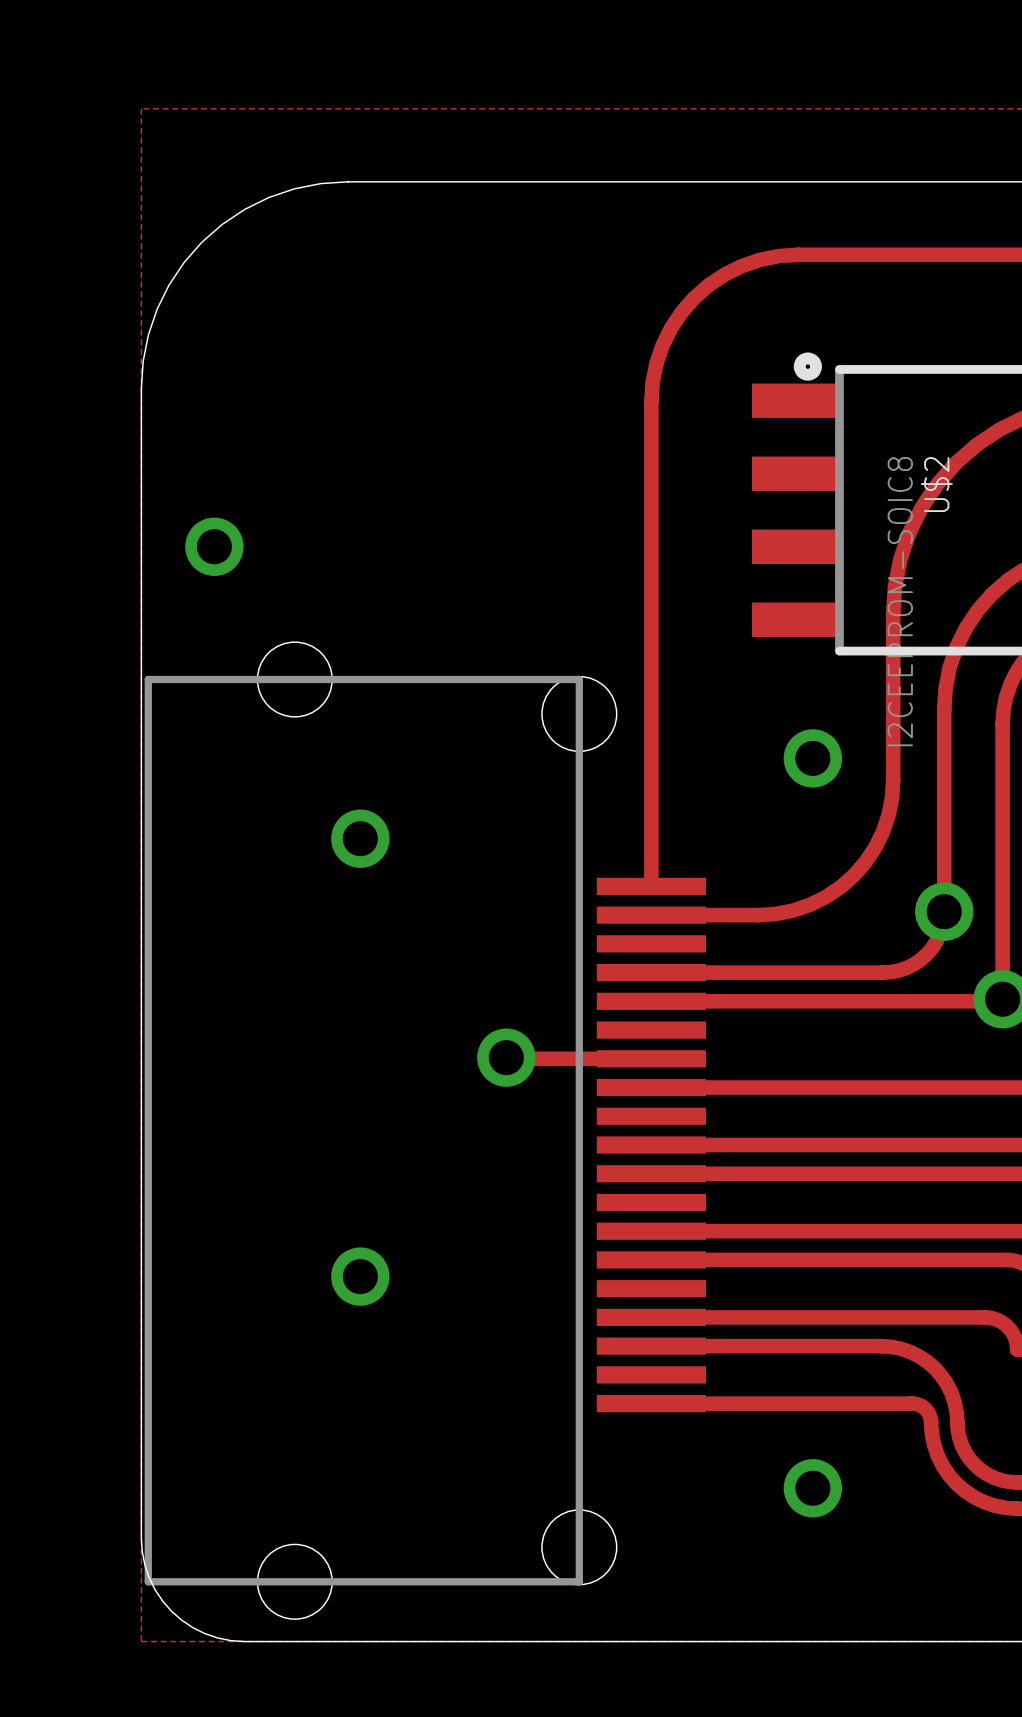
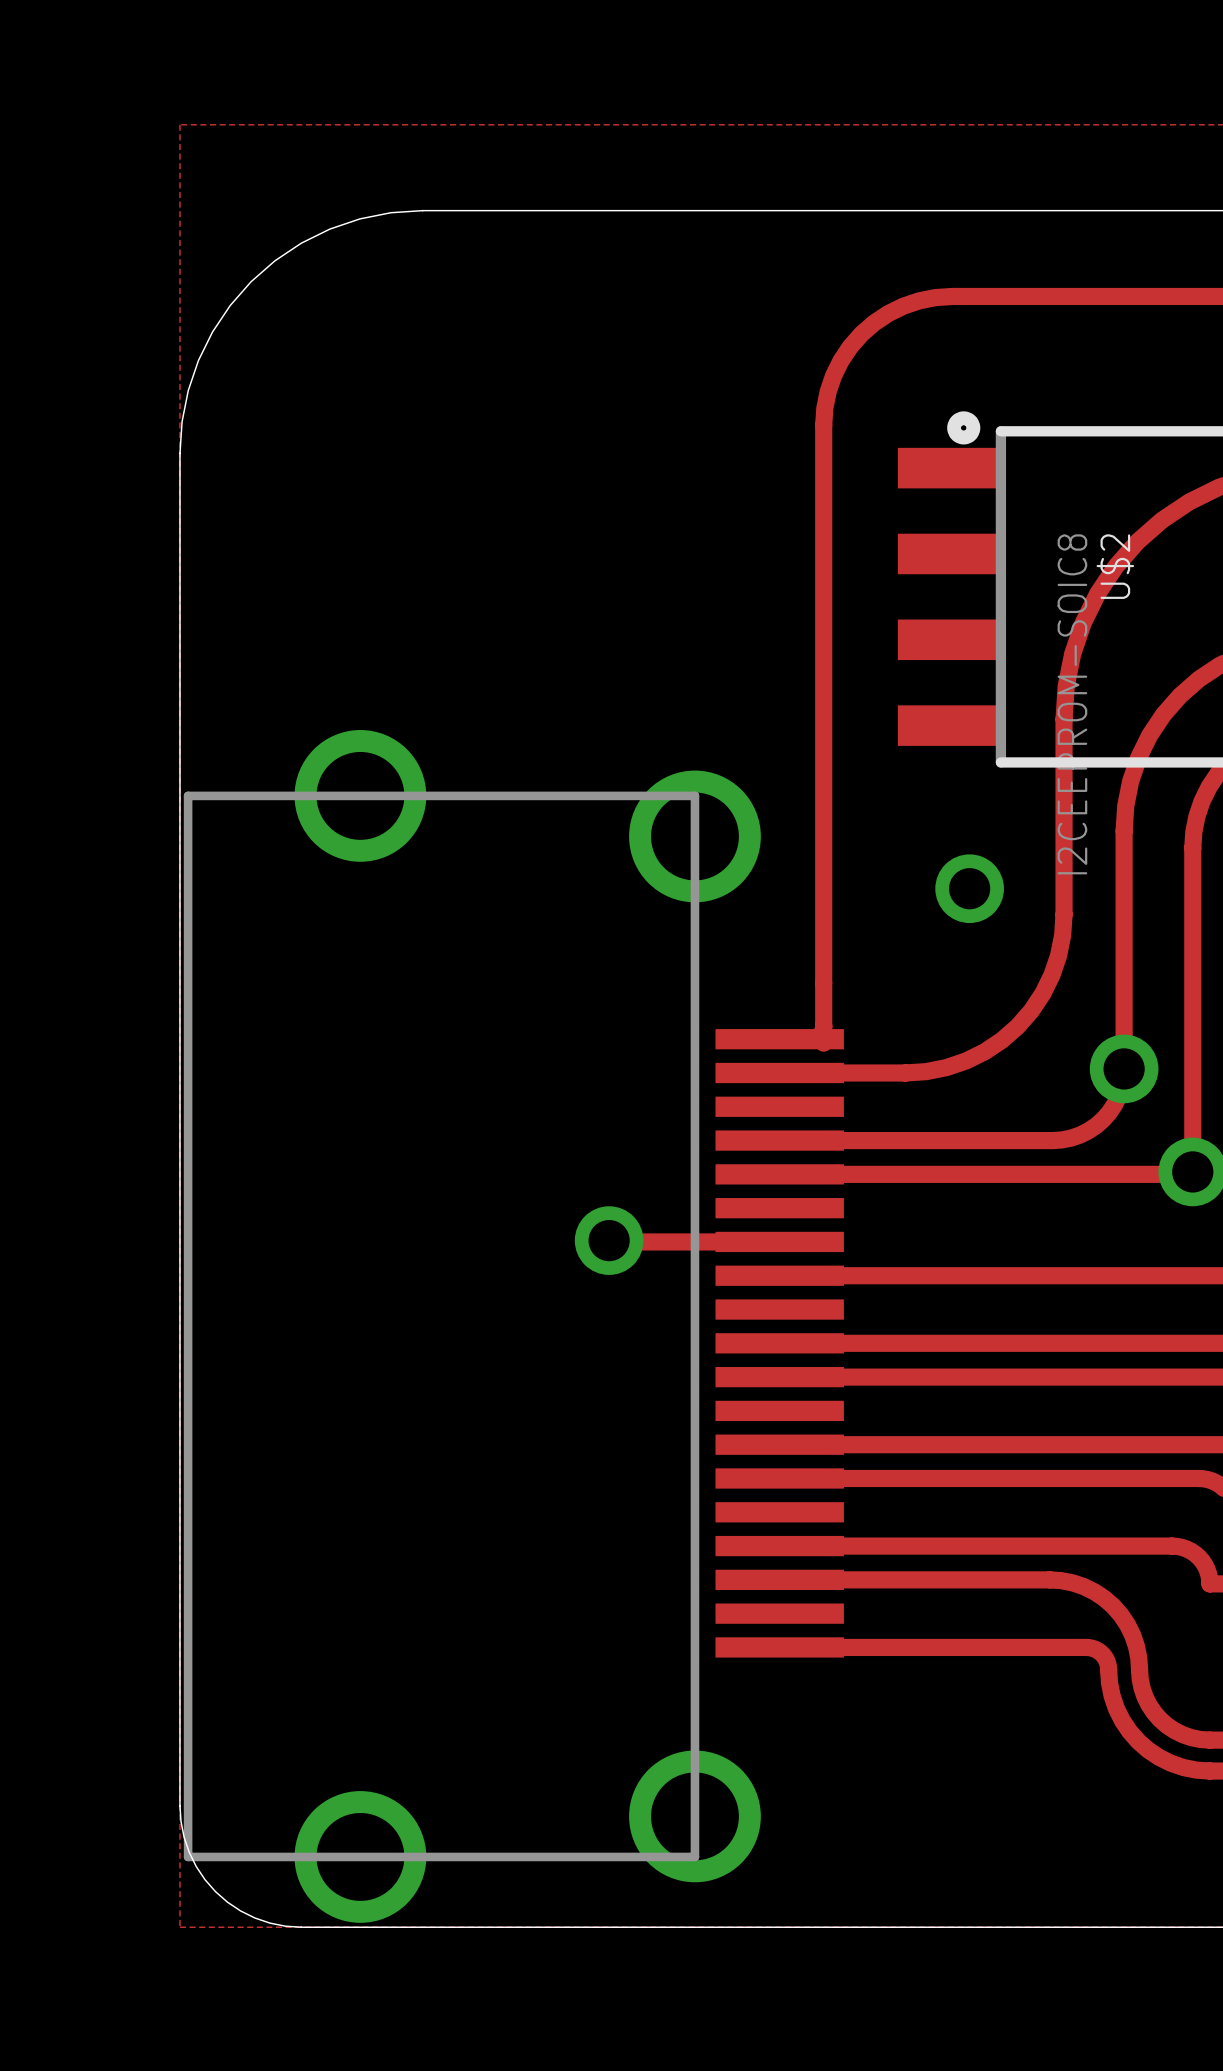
track: (798, 254) (779, 256) (742, 265) (708, 285) (681, 312) (662, 345) (656, 363) (651, 401) (651, 886) -> (952, 296) (919, 300) (903, 306) (888, 313) (861, 334) (840, 360) (833, 375) (824, 408) (823, 1043)
via: (214, 546) -> none
part footprint: [144, 642, 706, 1620] -> [183, 730, 844, 1923]
via: (360, 838) -> none
via: (360, 1276) -> none
via: (812, 1488) -> none

